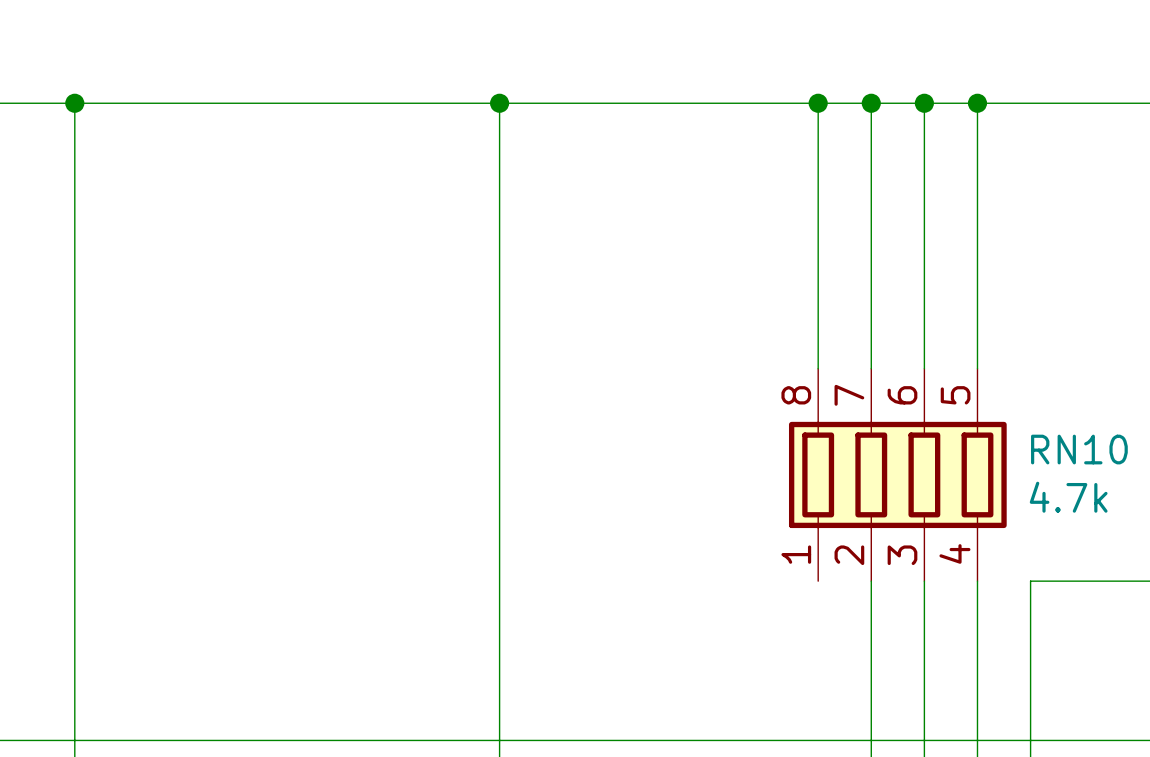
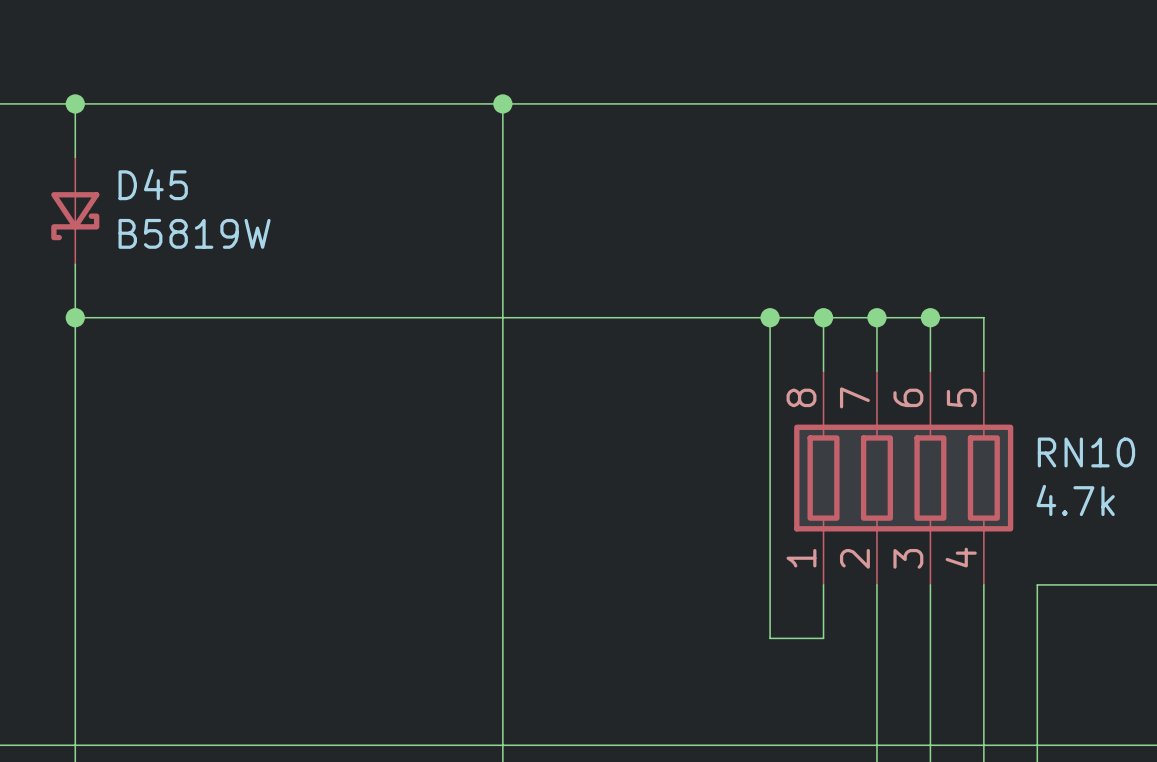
wire: (818, 103) (818, 315) -> none
junction: (818, 103) -> none
wire: (871, 103) (871, 315) -> none
junction: (871, 103) -> none
wire: (924, 103) (924, 315) -> none
junction: (924, 103) -> none
wire: (977, 103) (977, 315) -> (75, 317) (983, 317)
junction: (977, 103) -> none
D45: none -> B5819W (75, 210)
junction: none -> (75, 317)
wire: none -> (770, 317) (770, 638) (823, 638) (823, 584)
junction: none -> (770, 317)
junction: none -> (823, 317)
junction: none -> (876, 317)
junction: none -> (930, 317)

